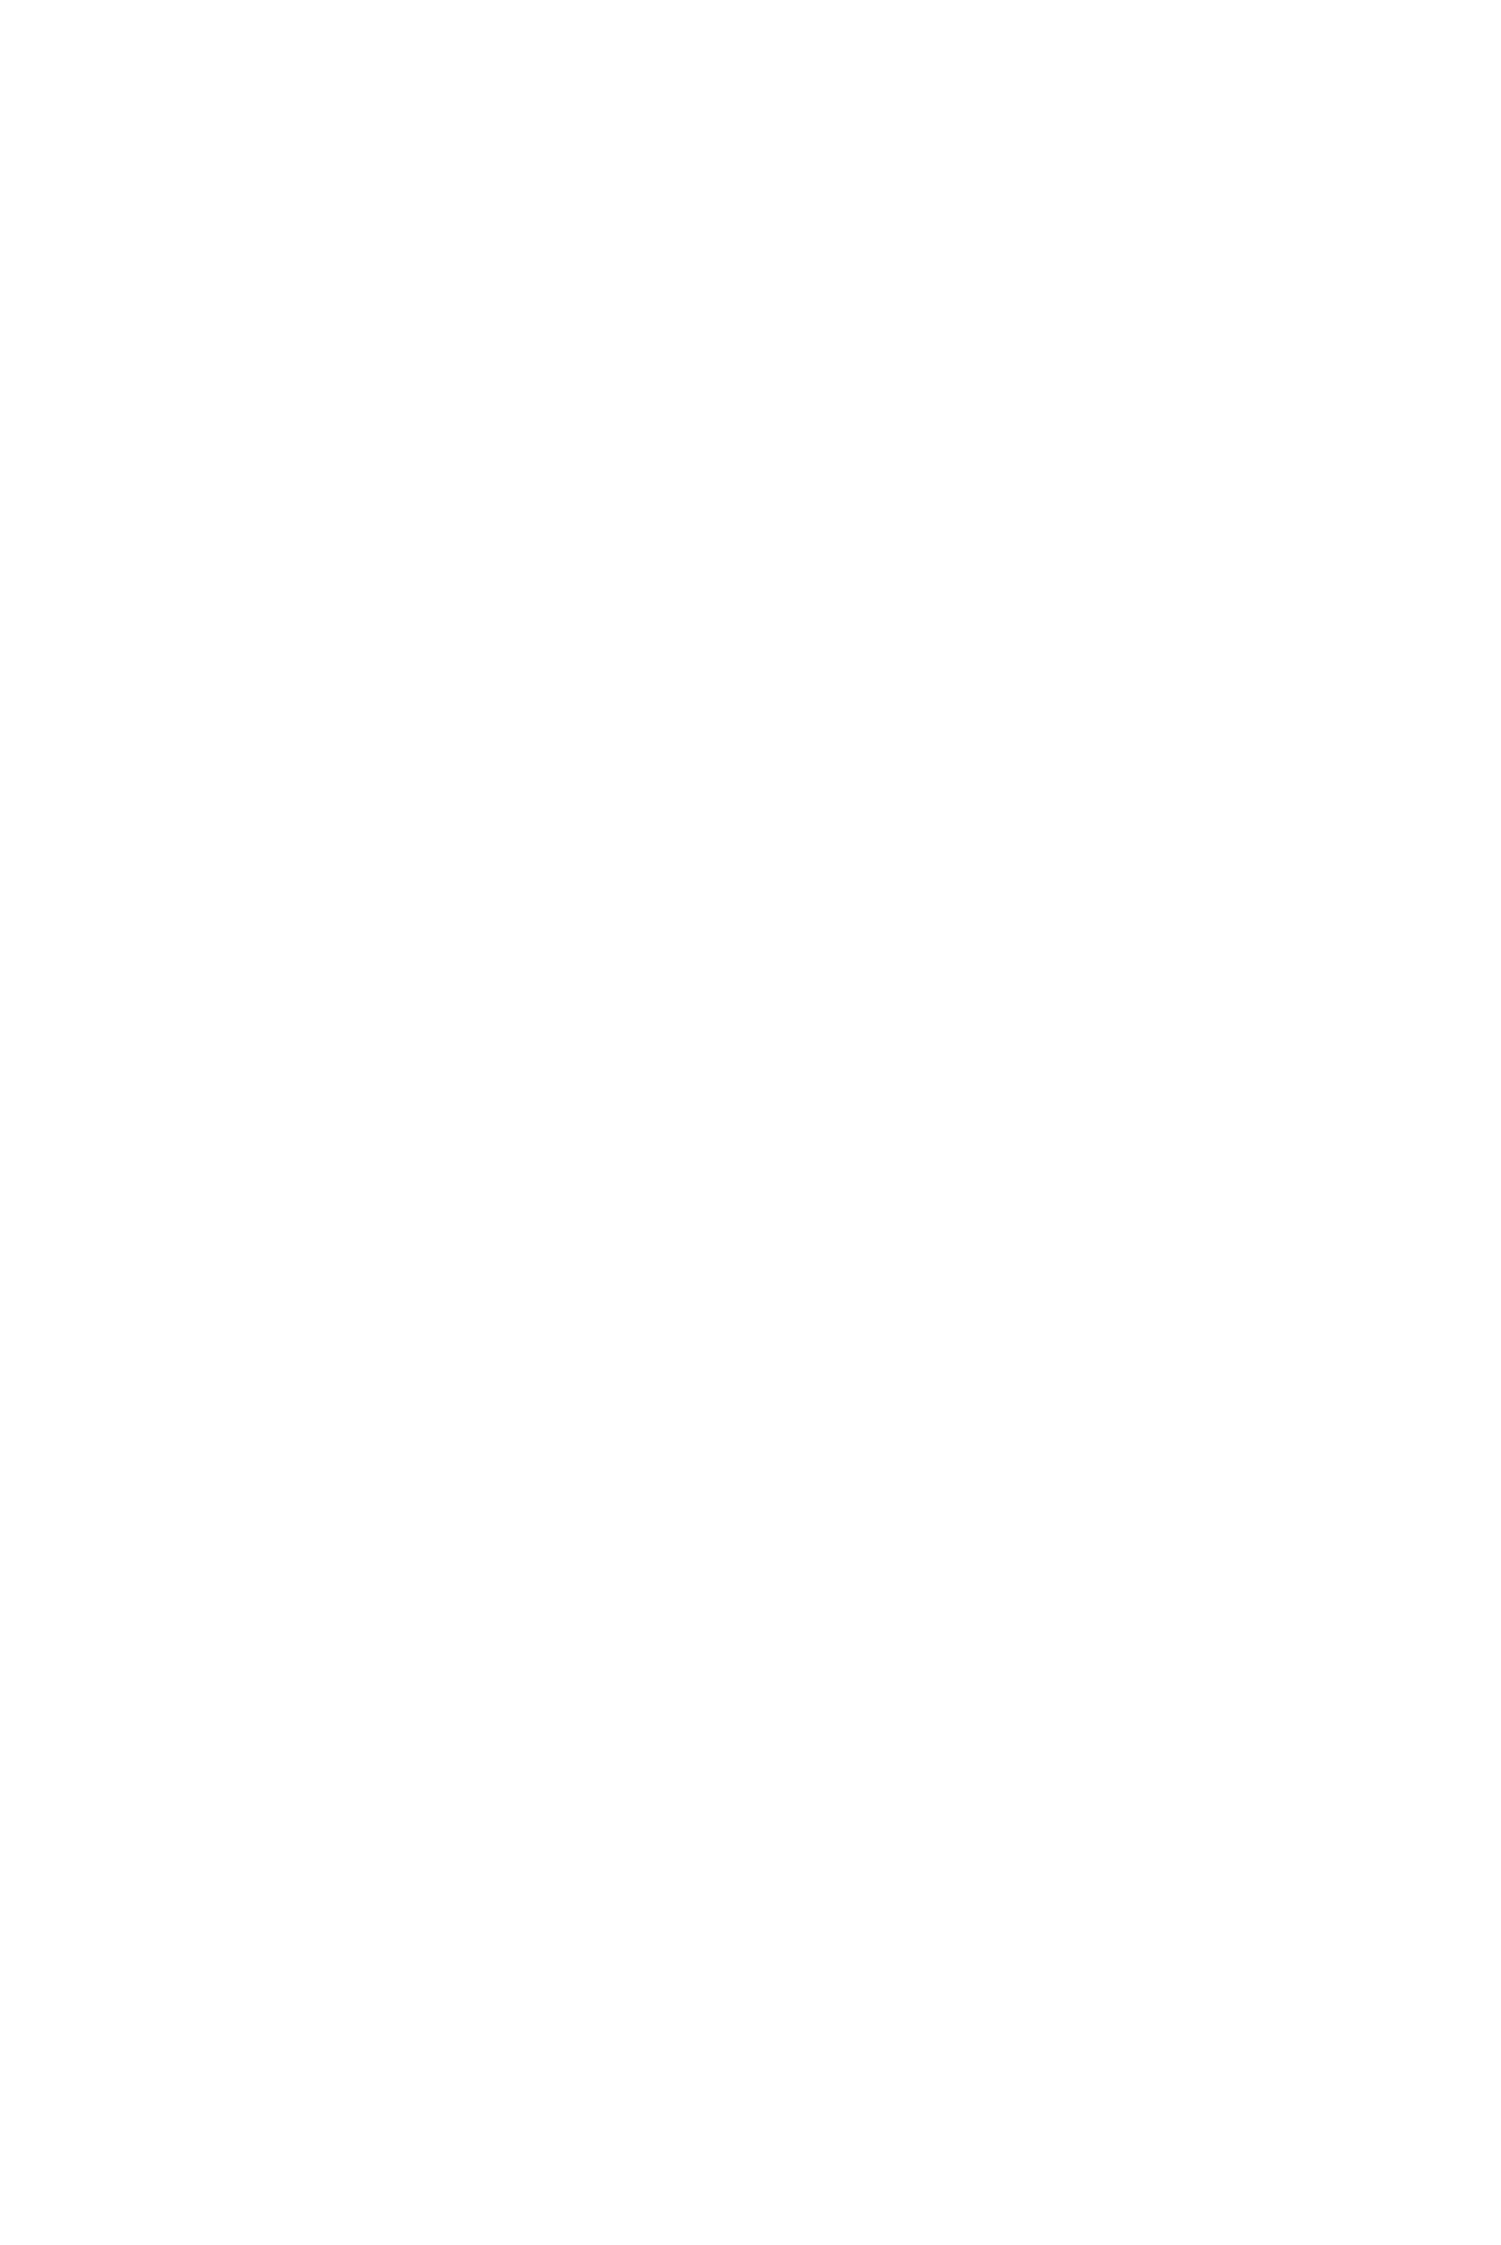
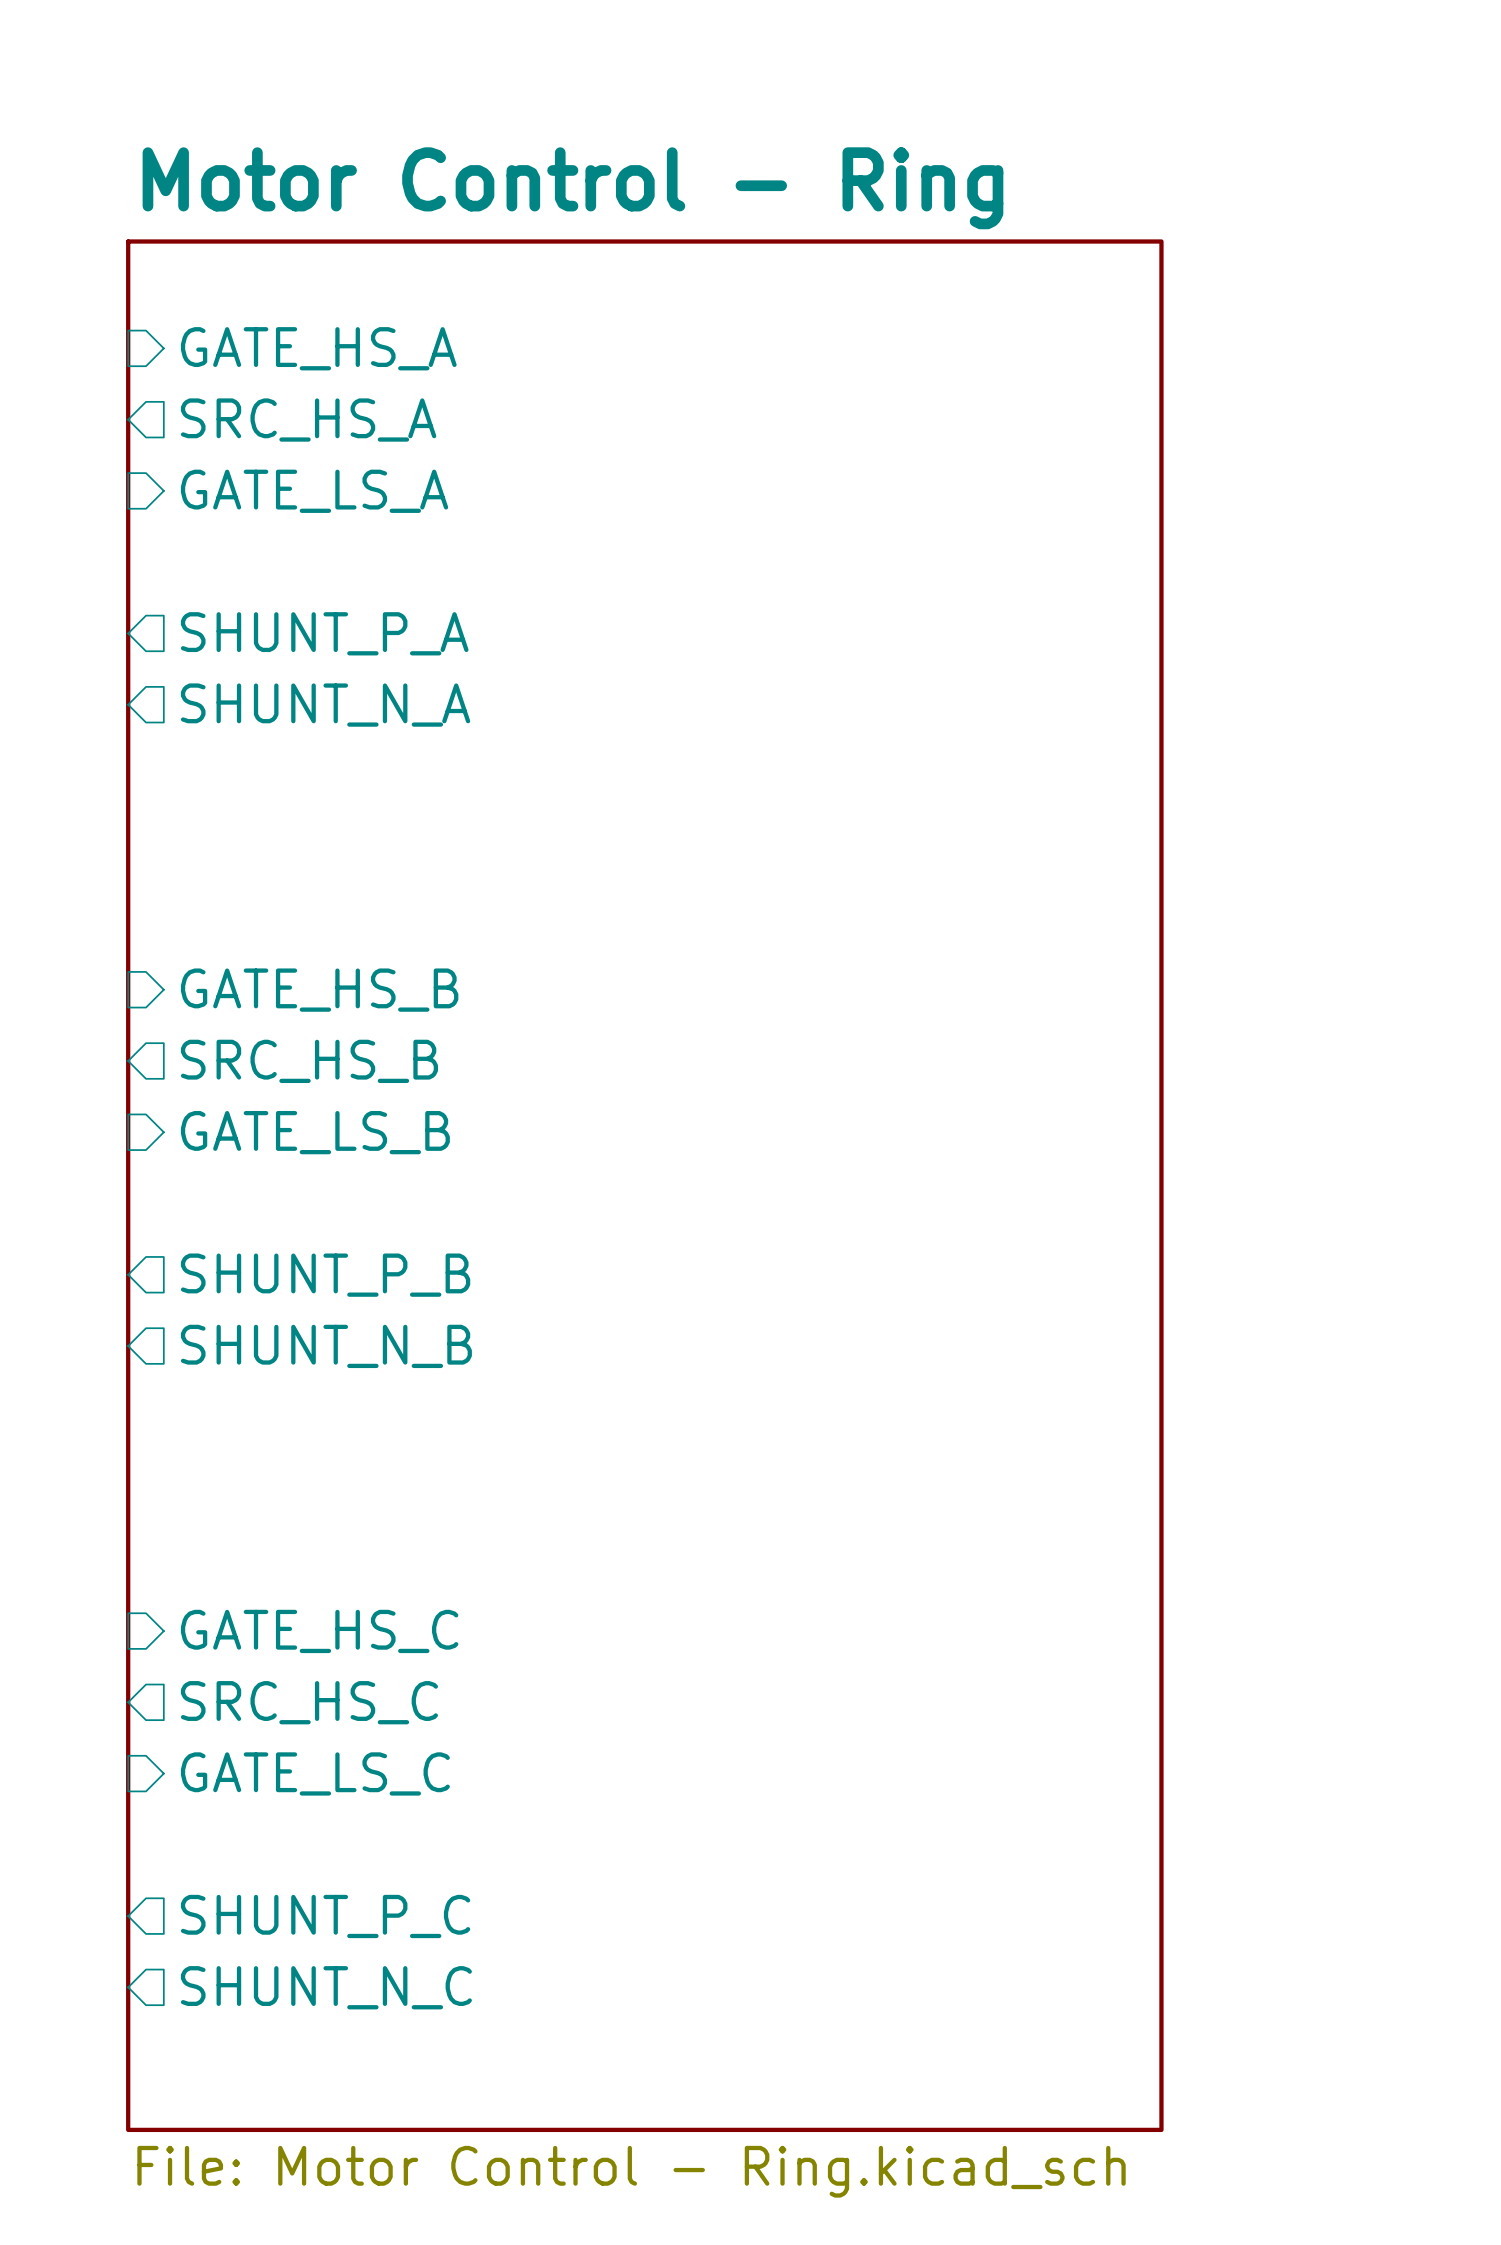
sheet pin: none -> GATE_HS_A (318, 348)
sheet pin: none -> SRC_HS_A (308, 420)
sheet pin: none -> GATE_LS_A (314, 491)
sheet pin: none -> SHUNT_P_A (324, 633)
sheet pin: none -> SHUNT_N_A (325, 705)
sheet pin: none -> GATE_HS_B (319, 990)
sheet pin: none -> SRC_HS_B (309, 1061)
sheet pin: none -> GATE_LS_B (315, 1132)
sheet Motor Control - Ring: none -> File: Motor Control - Ring.kicad_sch (644, 1185)
sheet pin: none -> SHUNT_P_B (325, 1275)
sheet pin: none -> SHUNT_N_B (326, 1346)
sheet pin: none -> GATE_HS_C (319, 1631)
sheet pin: none -> SRC_HS_C (309, 1702)
sheet pin: none -> GATE_LS_C (315, 1773)
sheet pin: none -> SHUNT_P_C (325, 1916)
sheet pin: none -> SHUNT_N_C (326, 1987)

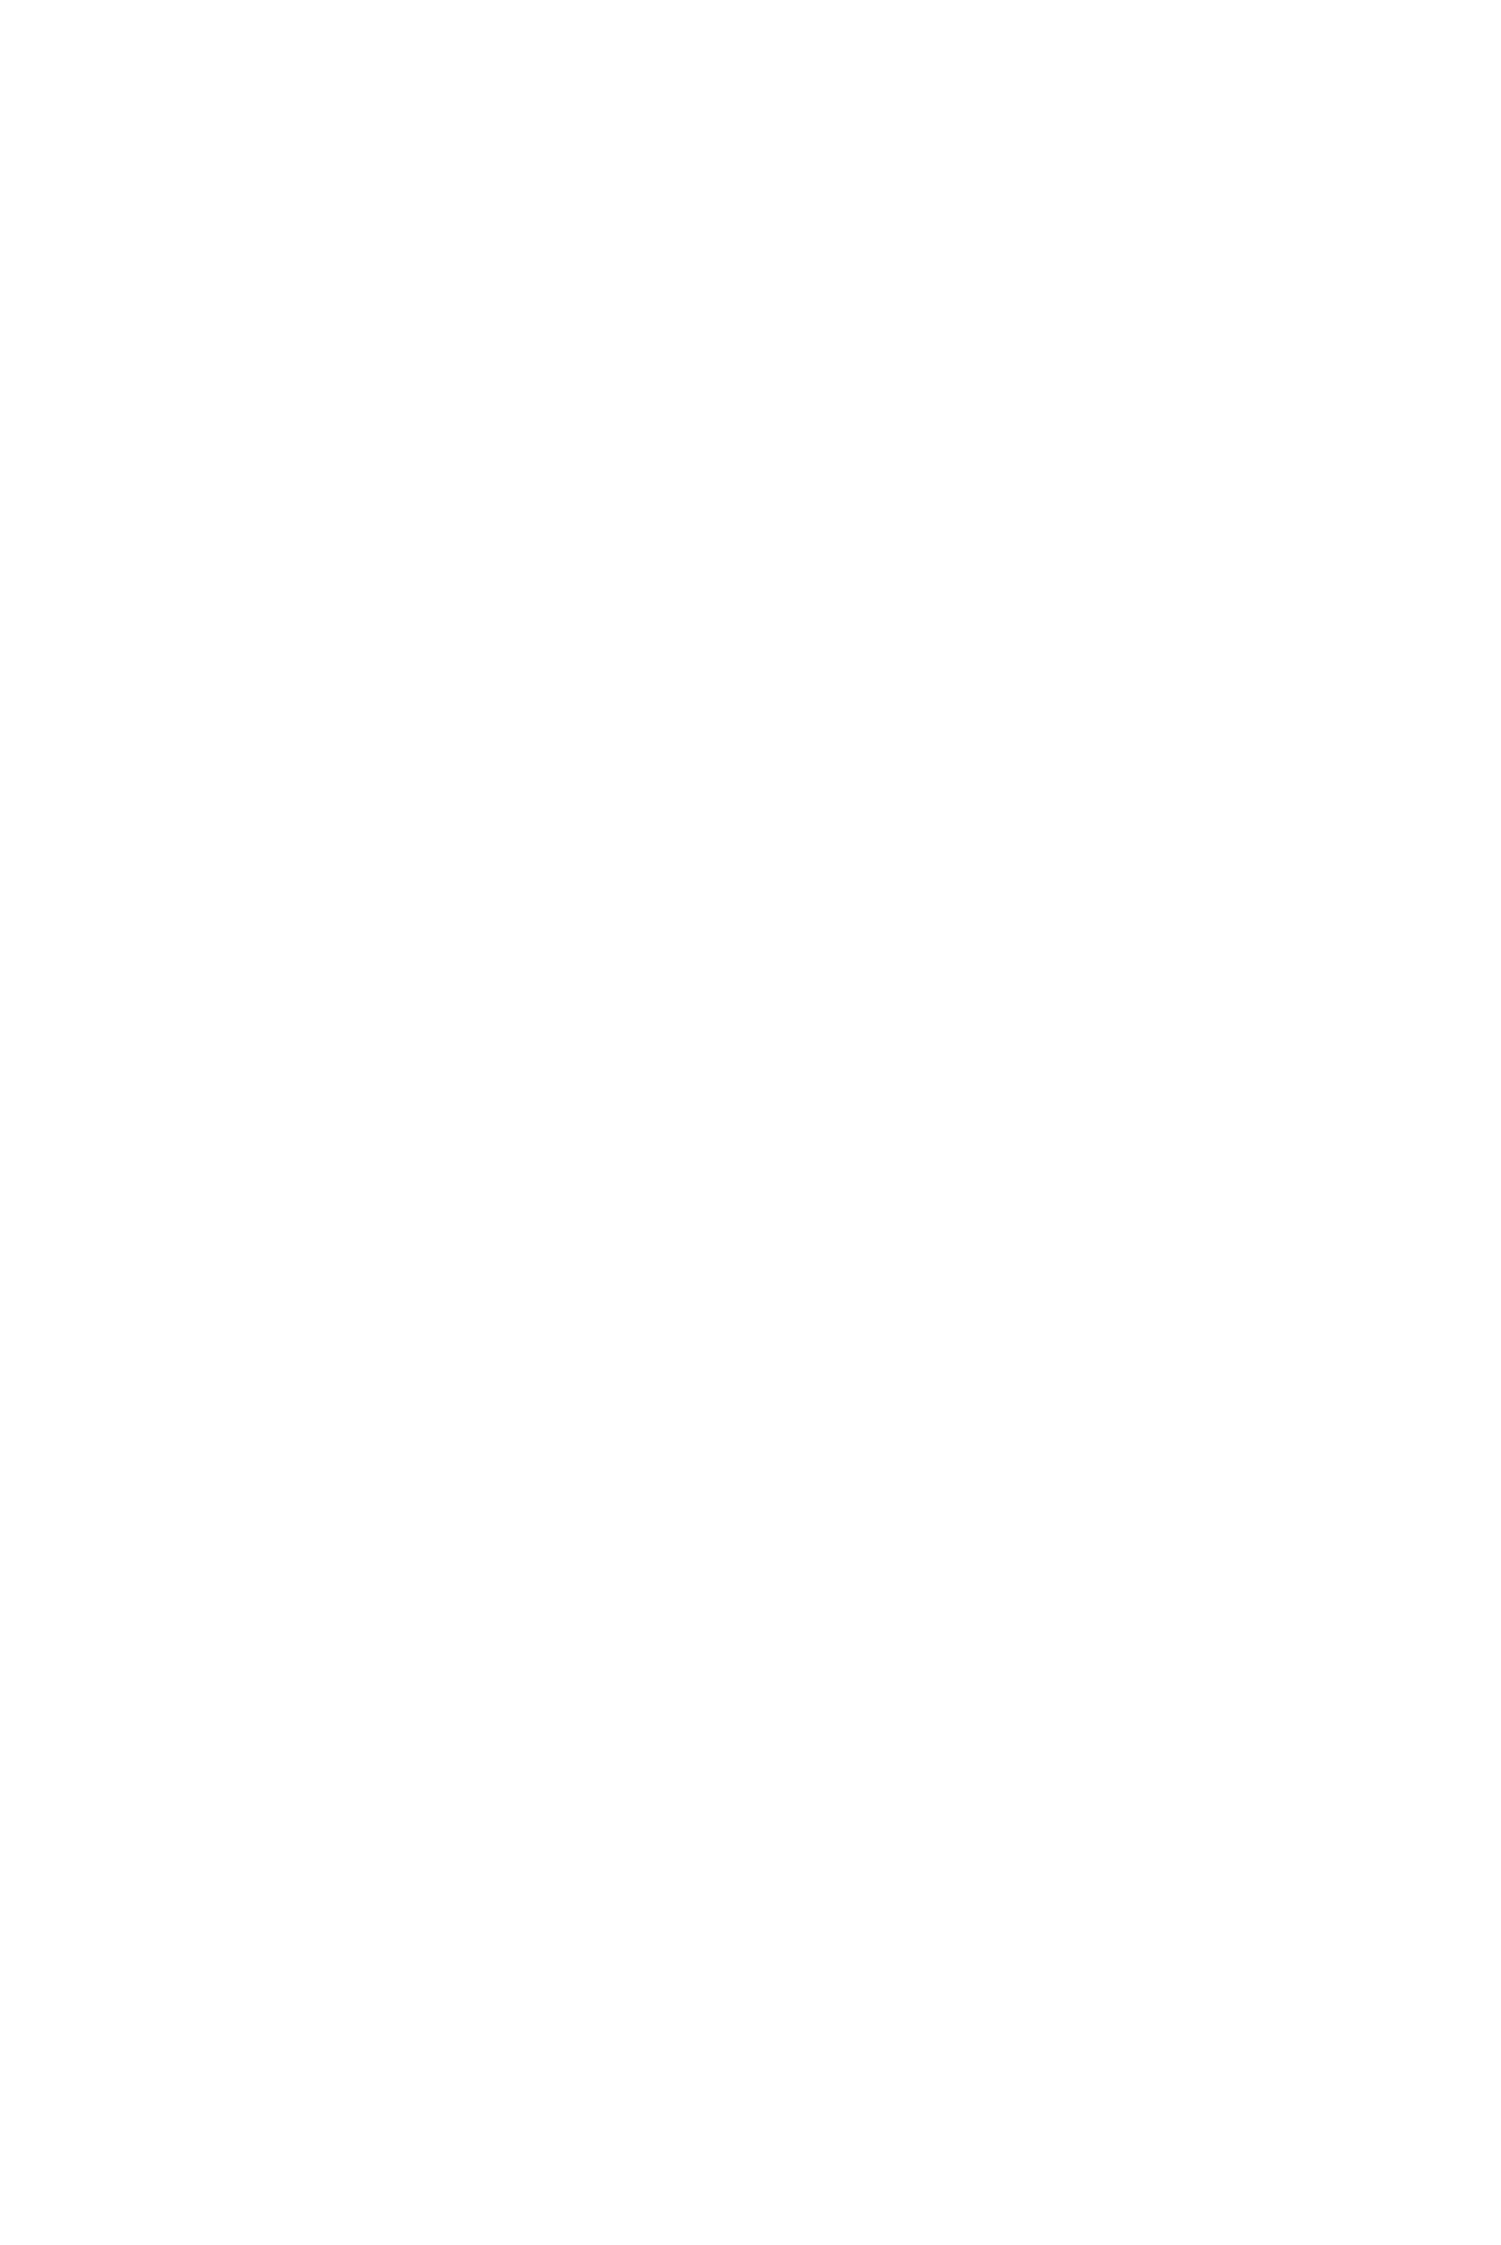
sheet pin: GATE_HS_A (318, 348) -> none
sheet pin: SRC_HS_A (308, 420) -> none
sheet pin: GATE_LS_A (314, 491) -> none
sheet pin: SHUNT_P_A (324, 633) -> none
sheet pin: SHUNT_N_A (325, 705) -> none
sheet pin: GATE_HS_B (319, 990) -> none
sheet pin: SRC_HS_B (309, 1061) -> none
sheet pin: GATE_LS_B (315, 1132) -> none
sheet Motor Control - Ring: File: Motor Control - Ring.kicad_sch (644, 1185) -> none
sheet pin: SHUNT_P_B (325, 1275) -> none
sheet pin: SHUNT_N_B (326, 1346) -> none
sheet pin: GATE_HS_C (319, 1631) -> none
sheet pin: SRC_HS_C (309, 1702) -> none
sheet pin: GATE_LS_C (315, 1773) -> none
sheet pin: SHUNT_P_C (325, 1916) -> none
sheet pin: SHUNT_N_C (326, 1987) -> none

